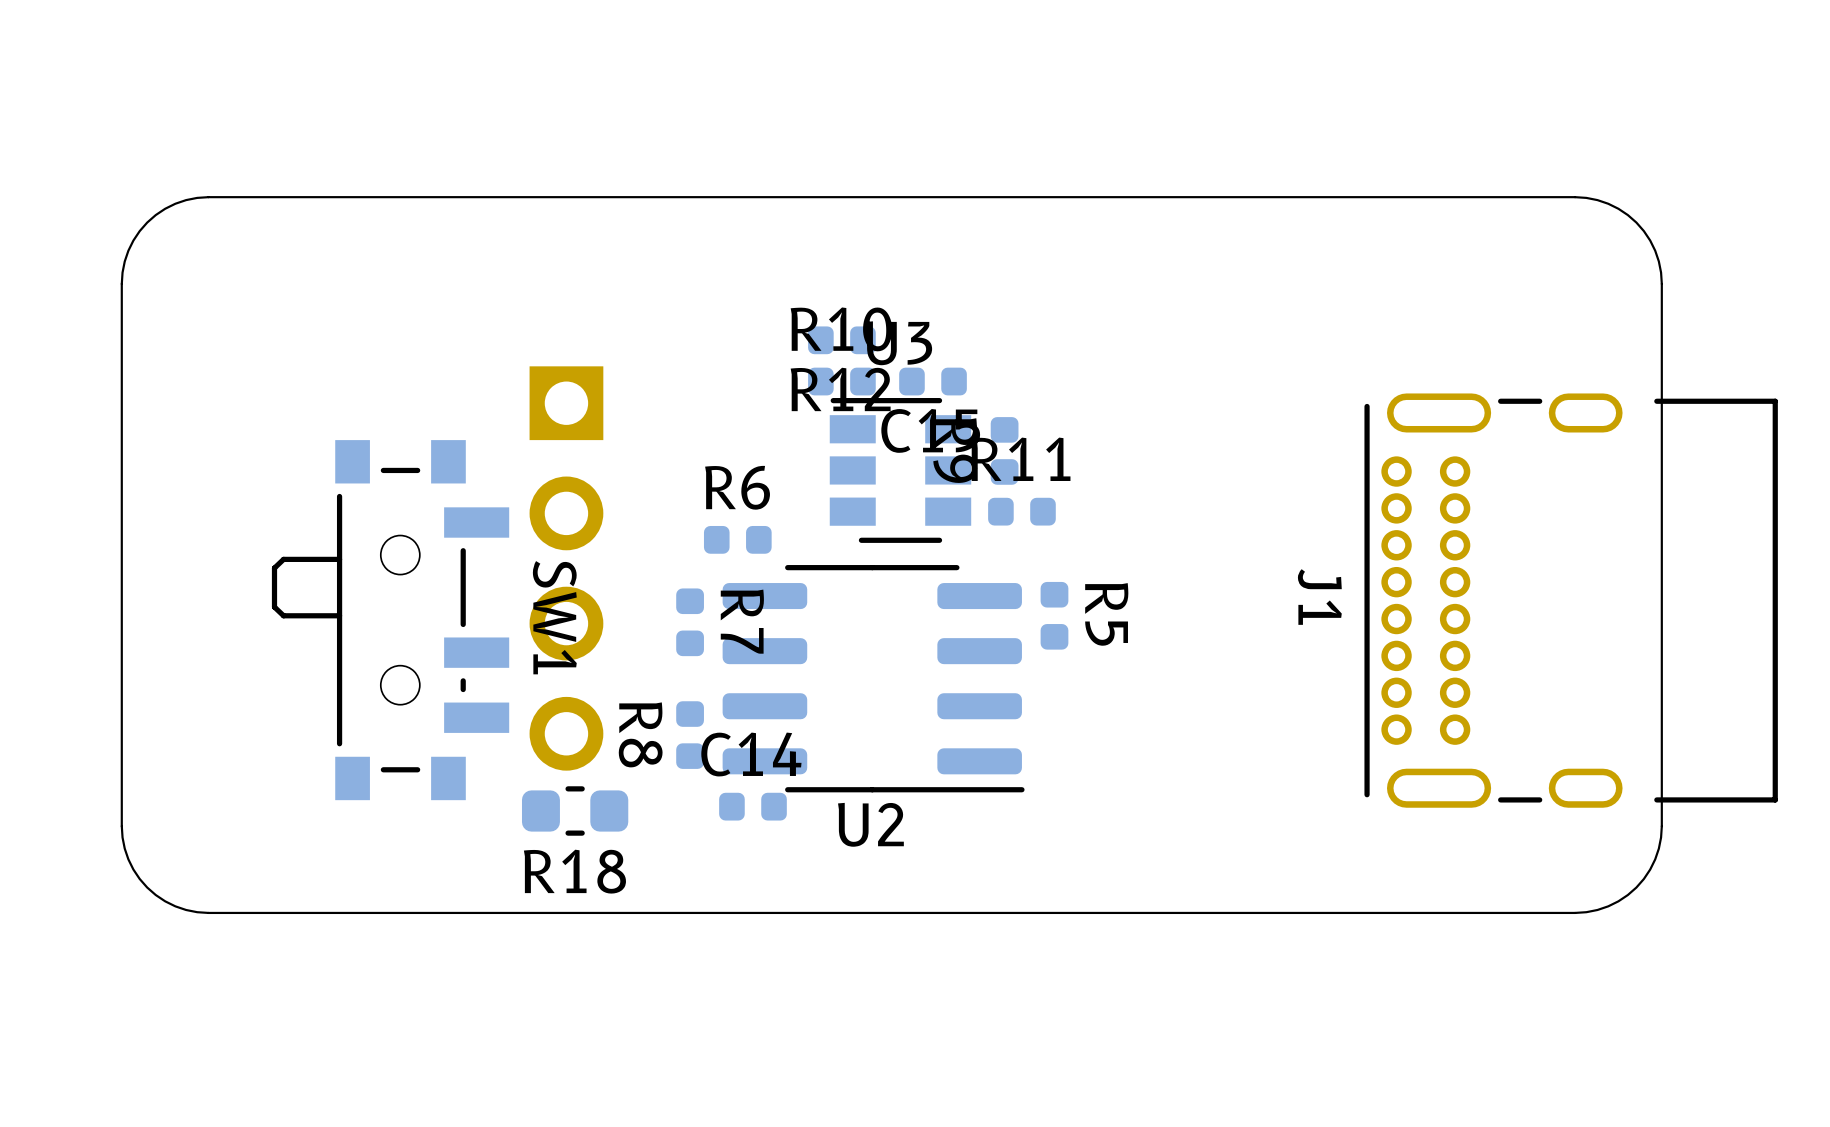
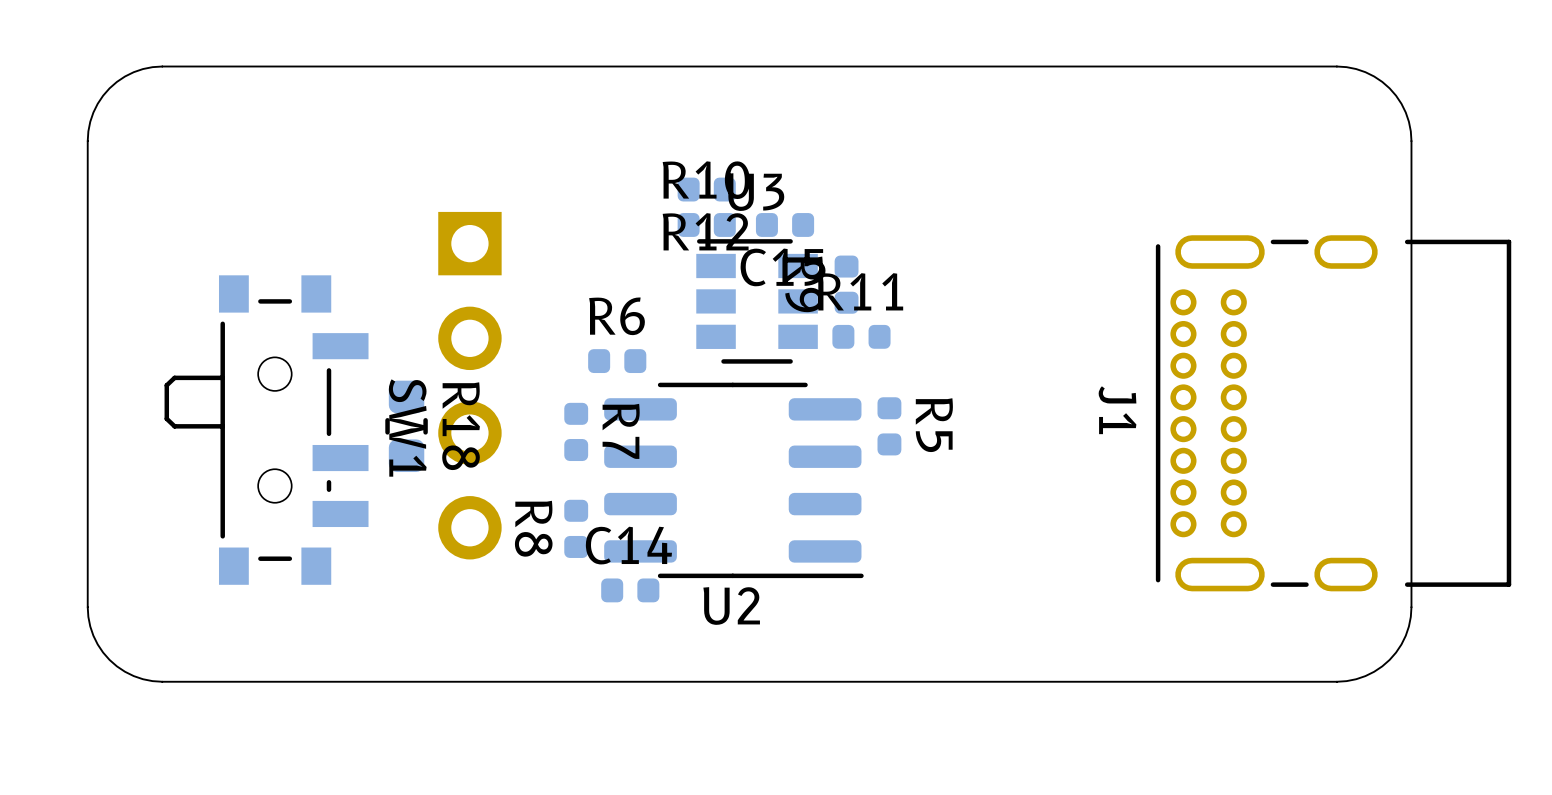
SW1 position: (390, 620) -> (266, 430)
R18 rotation: 0° (575, 810) -> 90° clockwise (406, 426)
R18 position: (575, 810) -> (406, 426)
R18 name position: R18 (574, 871) -> R18 (461, 426)

